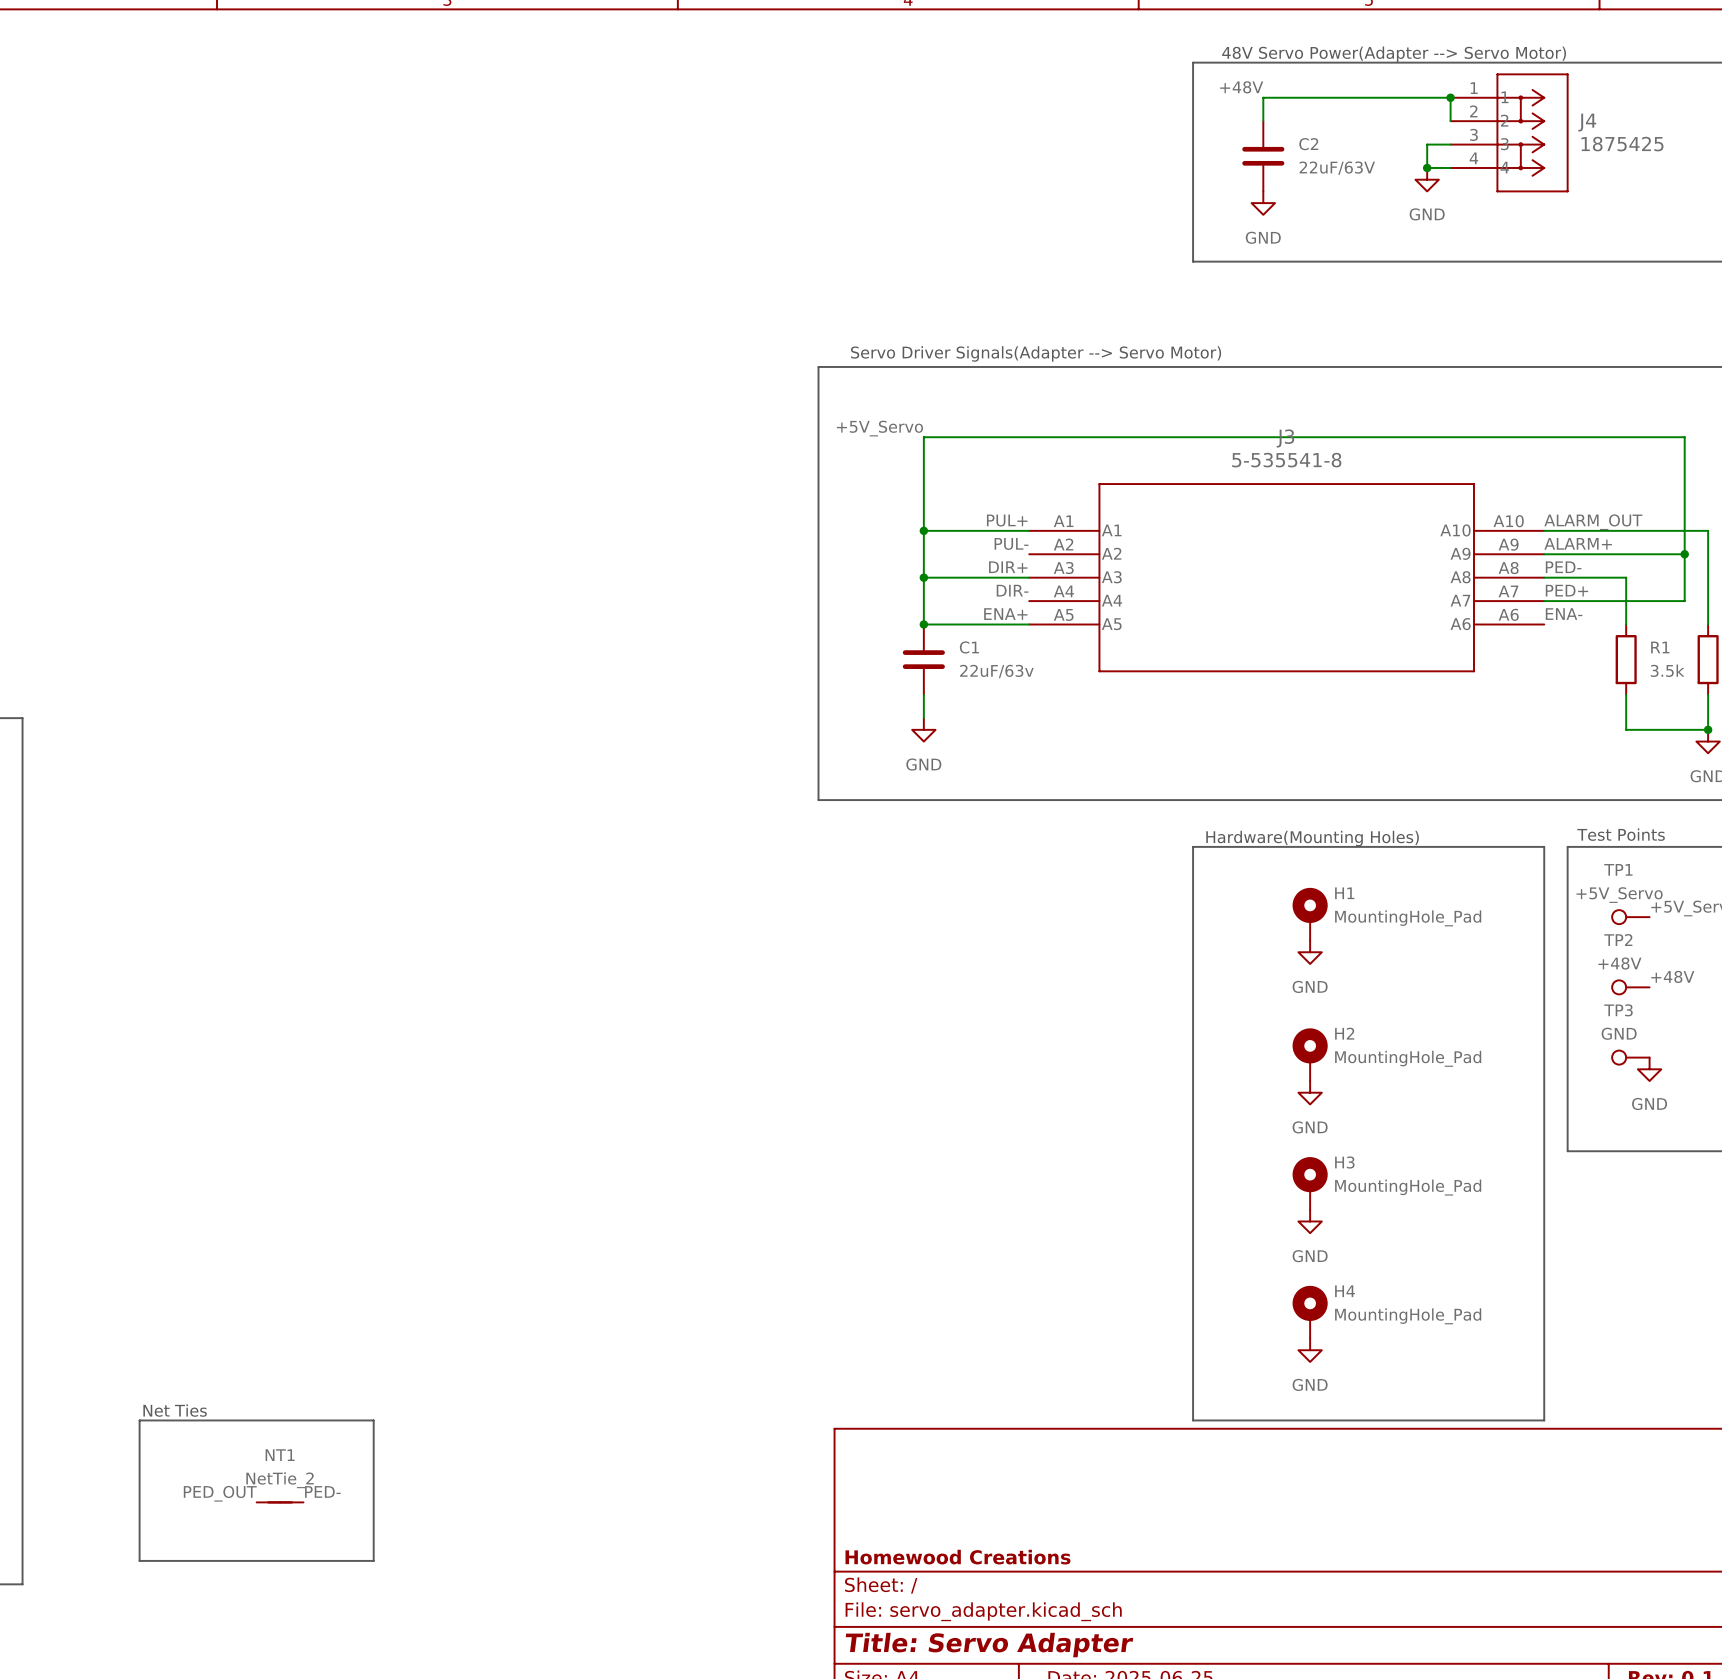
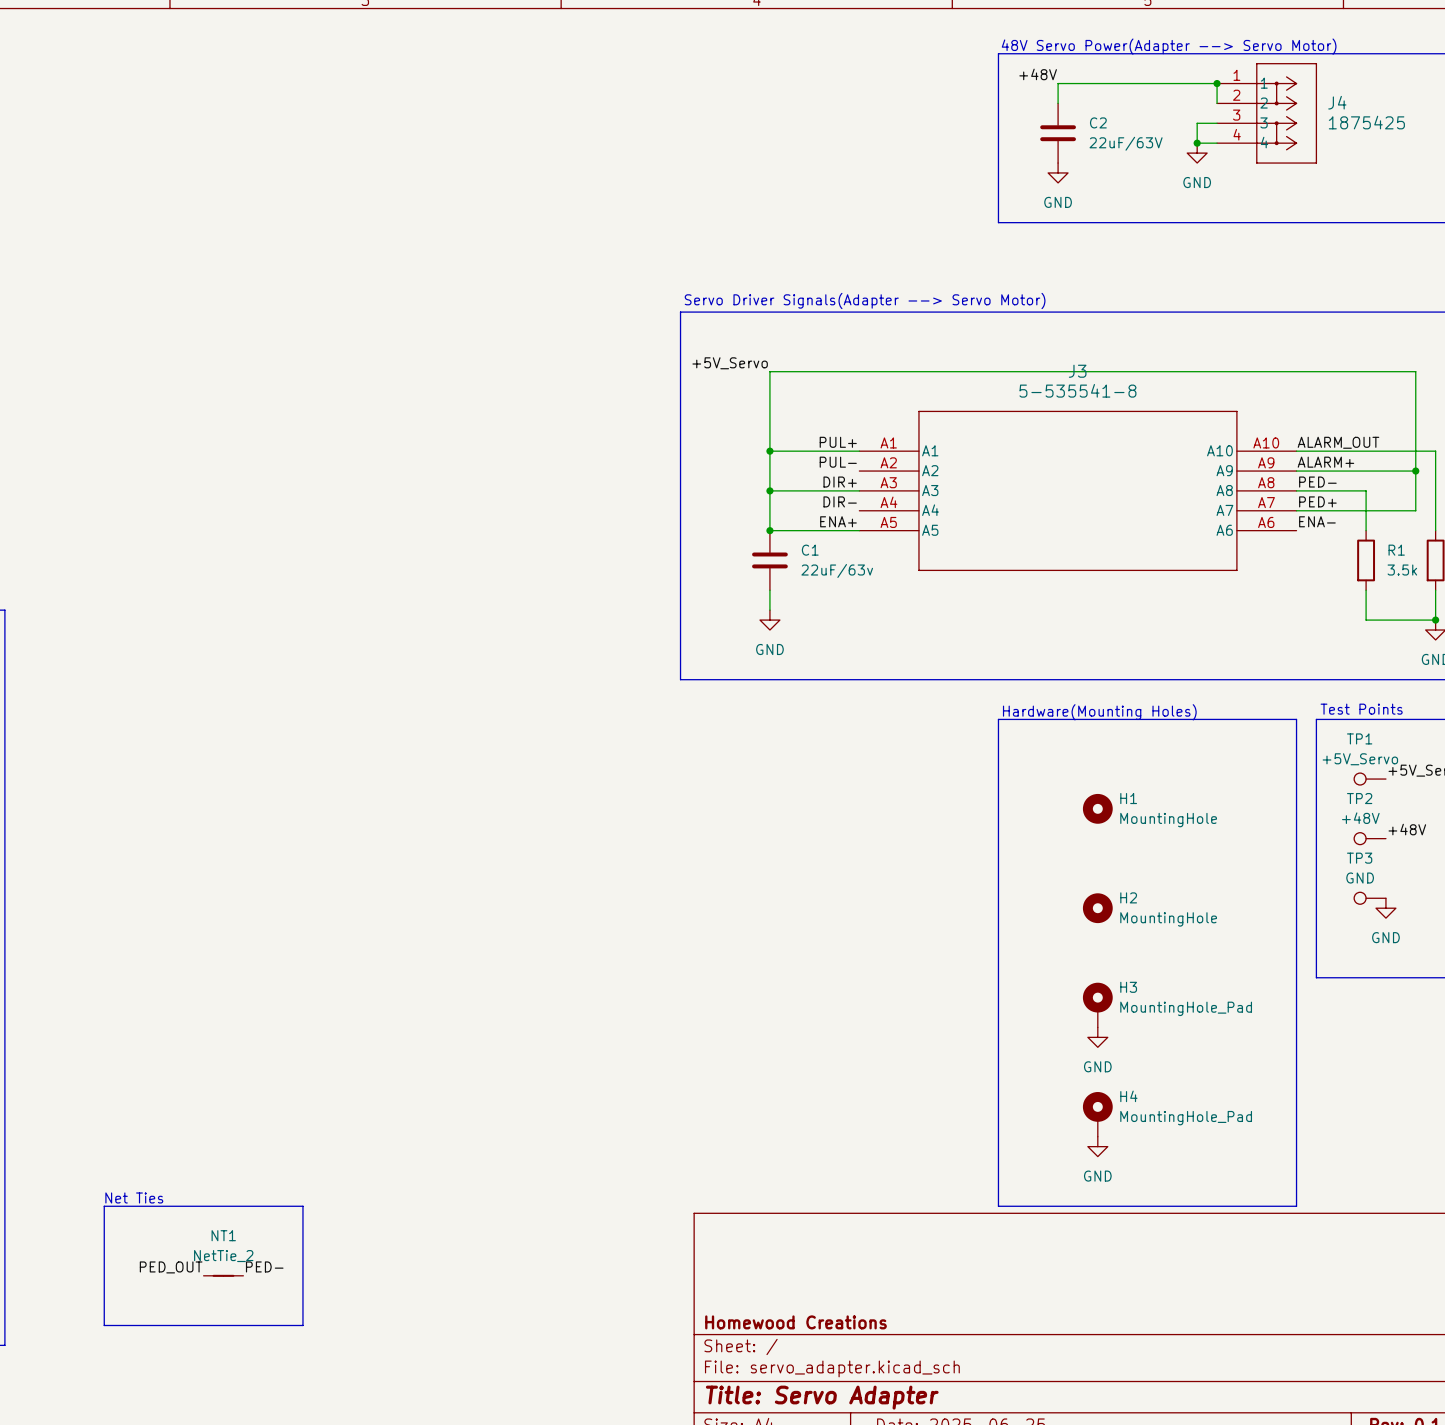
H1 symbol: [1292, 887, 1328, 941] -> [1082, 793, 1113, 824]
H1 value: MountingHole_Pad (1408, 918) -> MountingHole (1168, 820)
power symbol: GND (1310, 952) -> none
H2 symbol: [1292, 1028, 1328, 1082] -> [1082, 893, 1113, 924]
H2 value: MountingHole_Pad (1408, 1058) -> MountingHole (1168, 919)
power symbol: GND (1310, 1092) -> none

